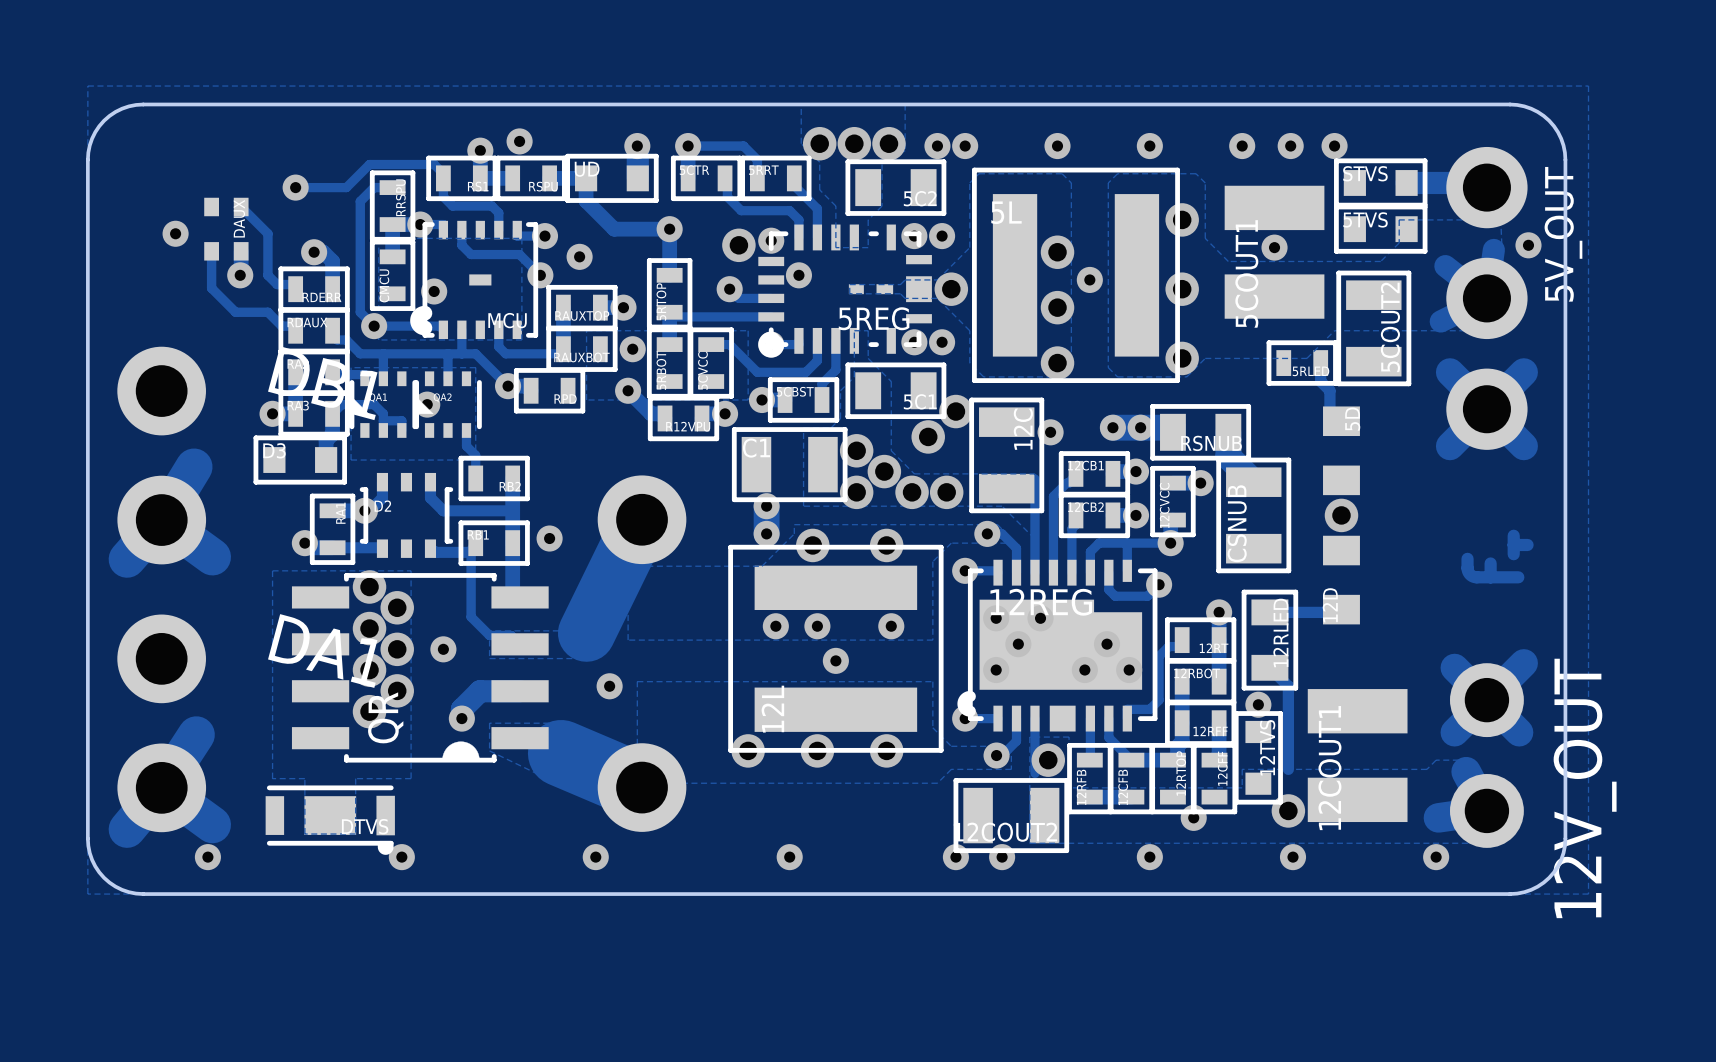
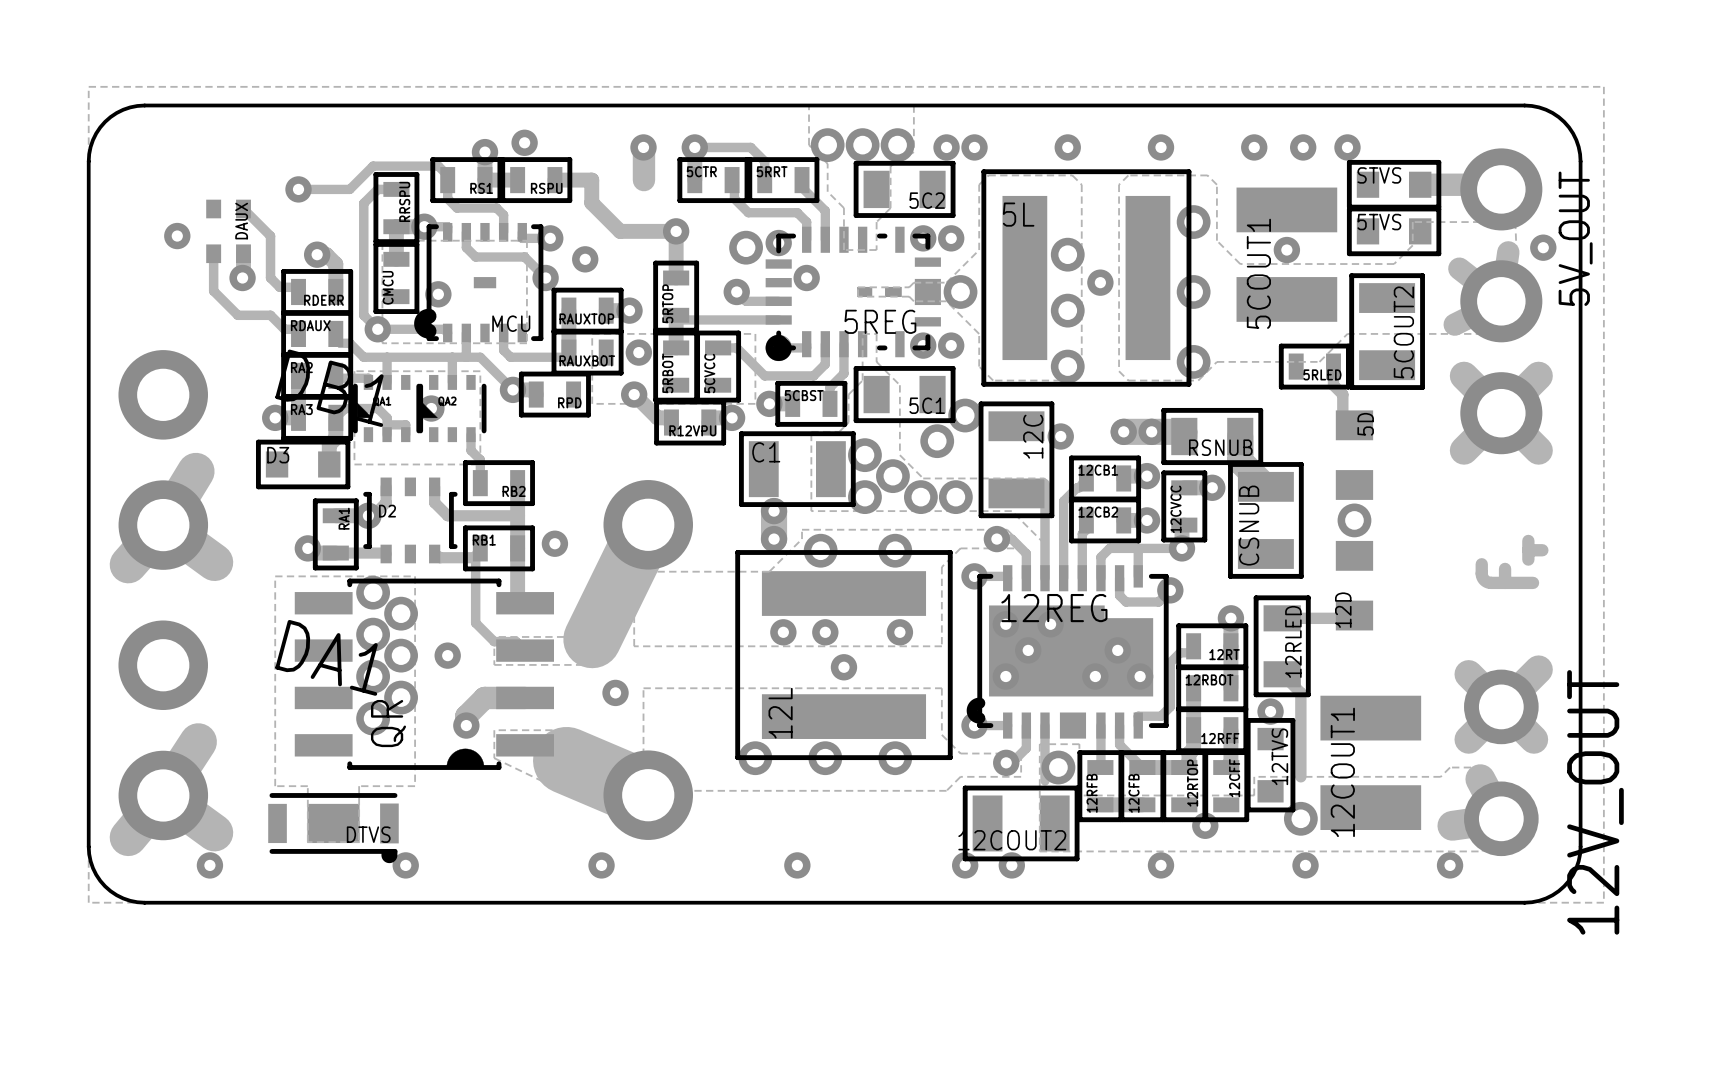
part: (611, 178) -> none

